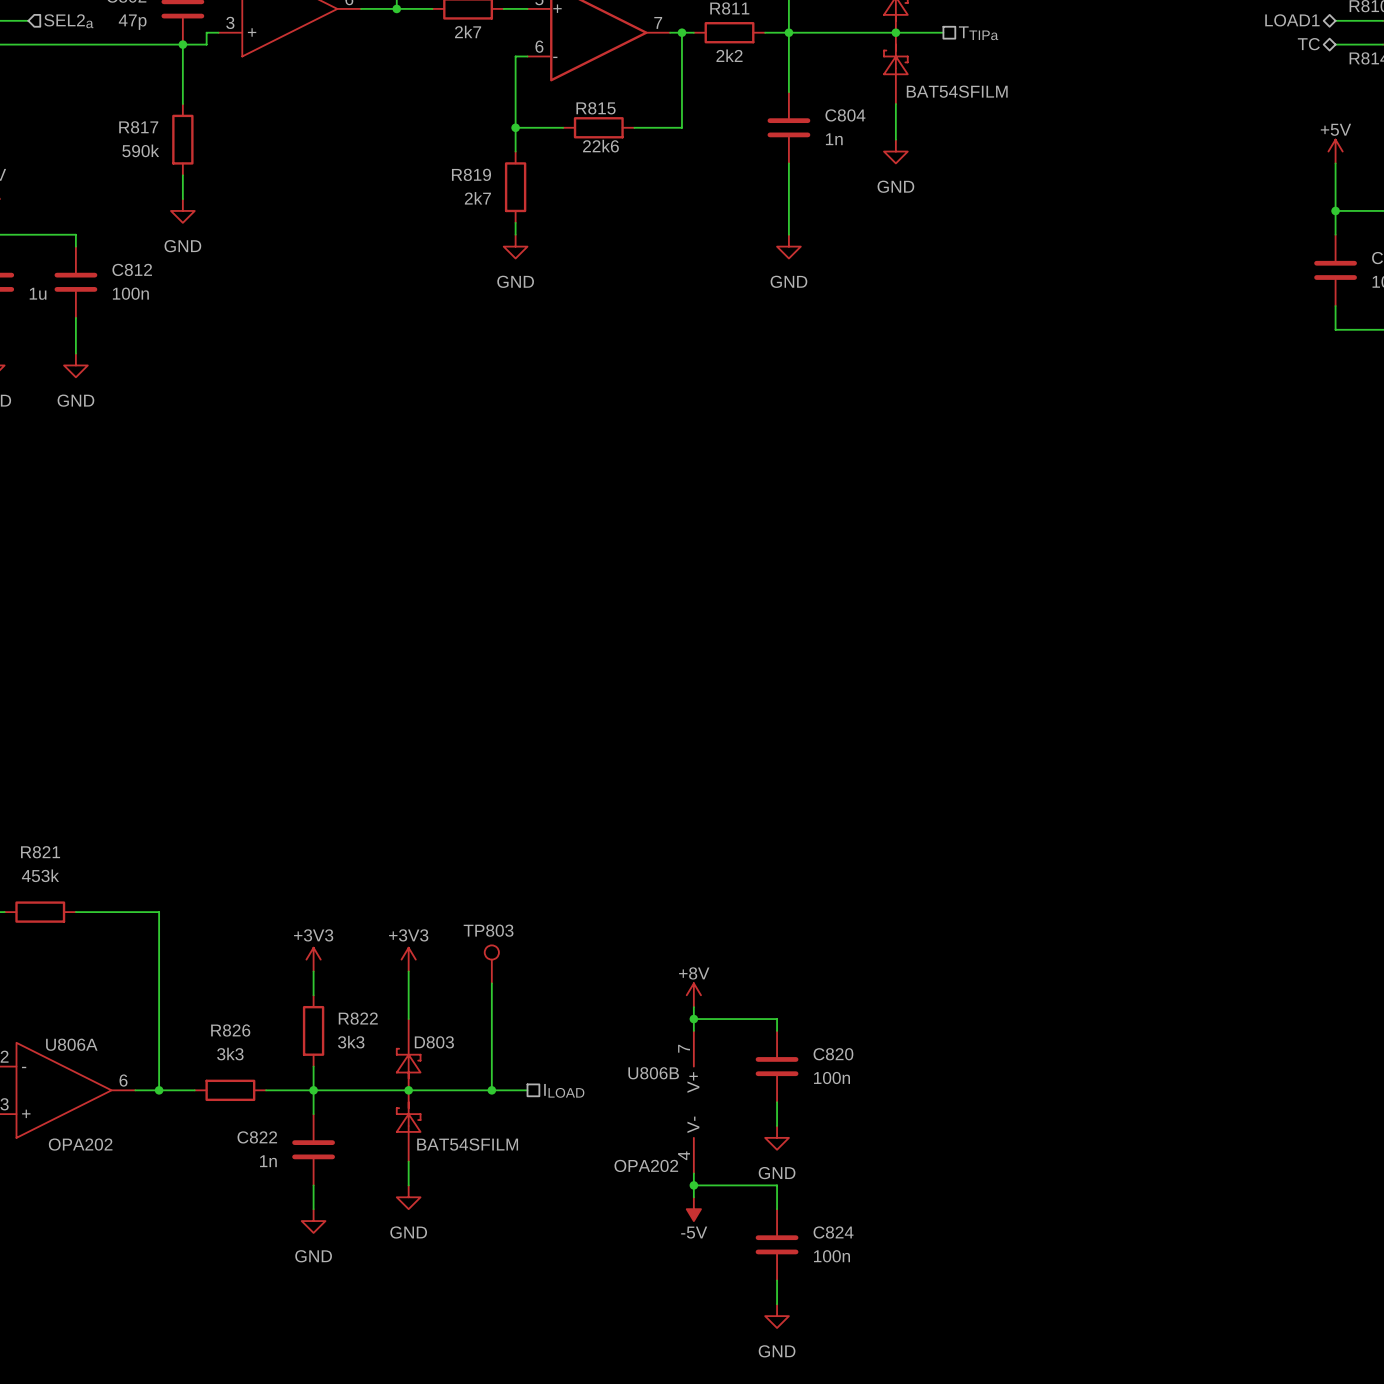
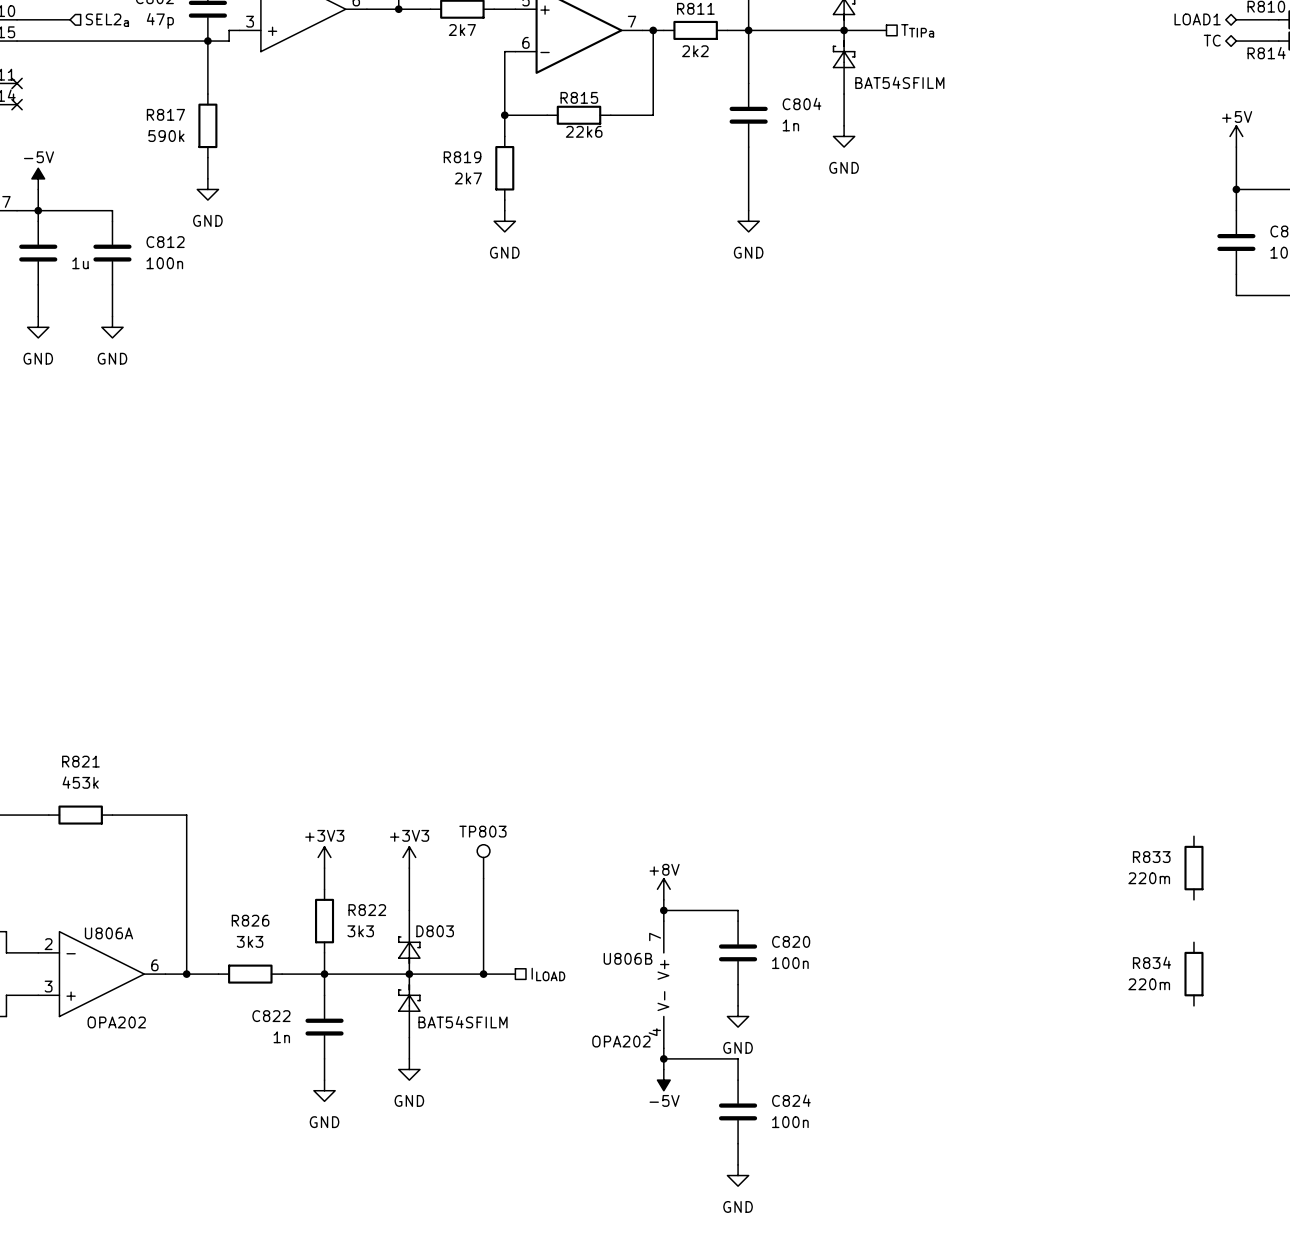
R833: none -> 220m (1193, 868)
R834: none -> 220m (1193, 974)

